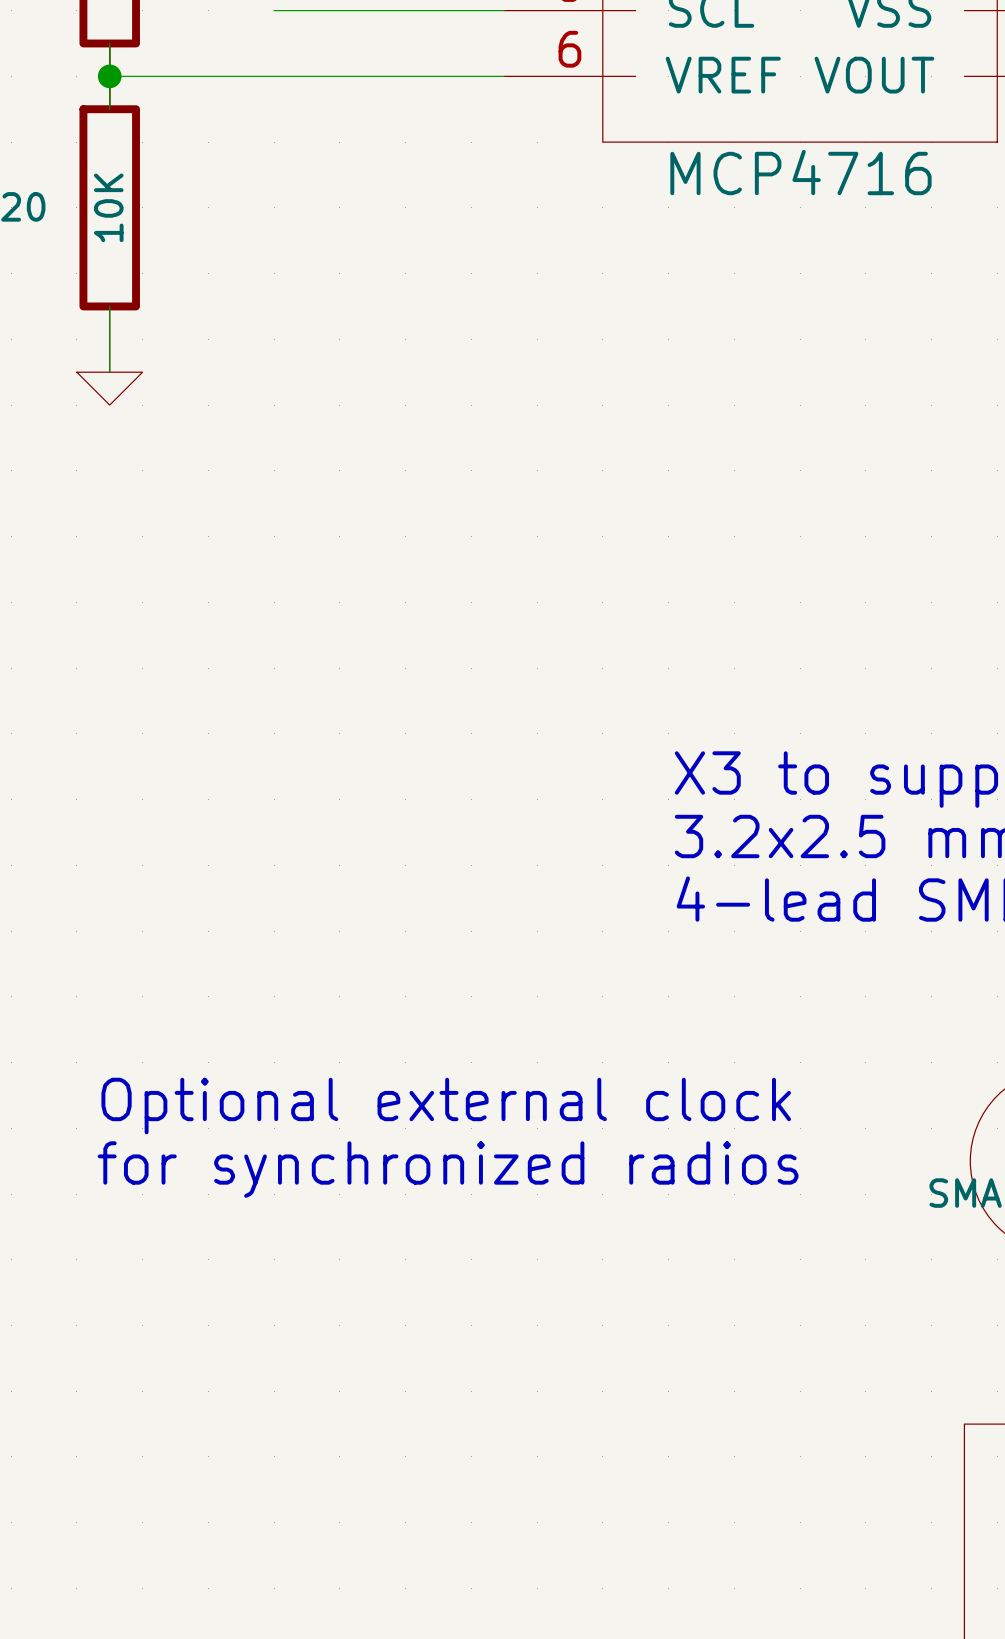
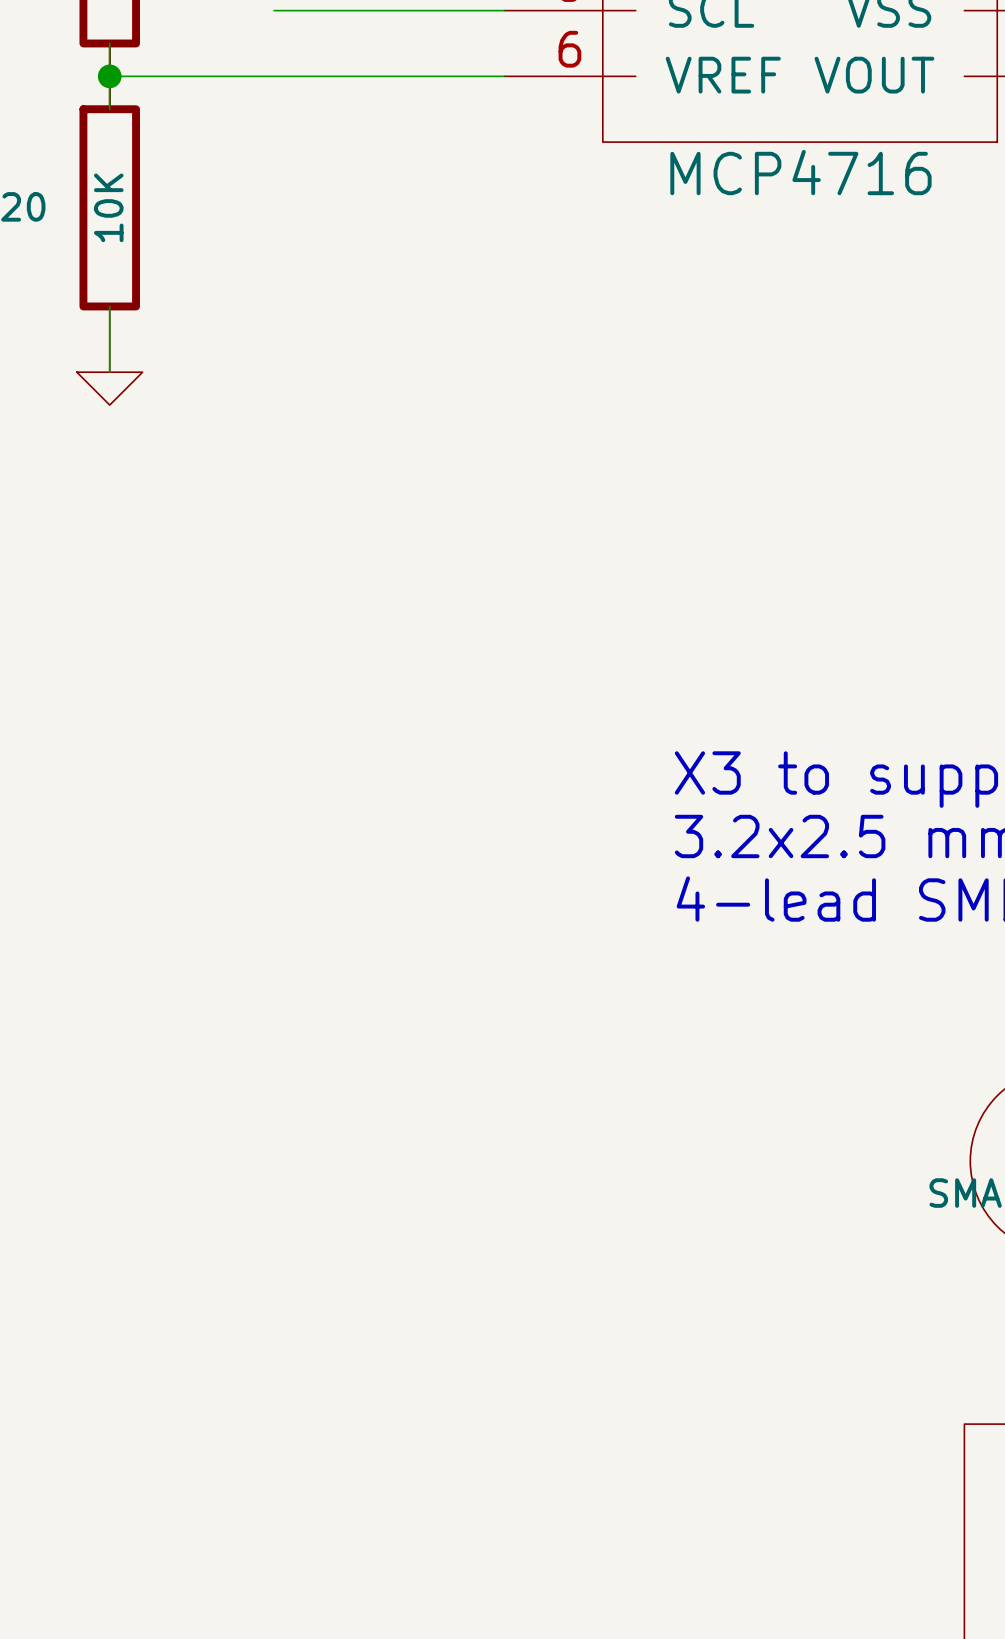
text: Optional external clock (446, 1106) -> none
text: for synchronized radios (448, 1169) -> none

